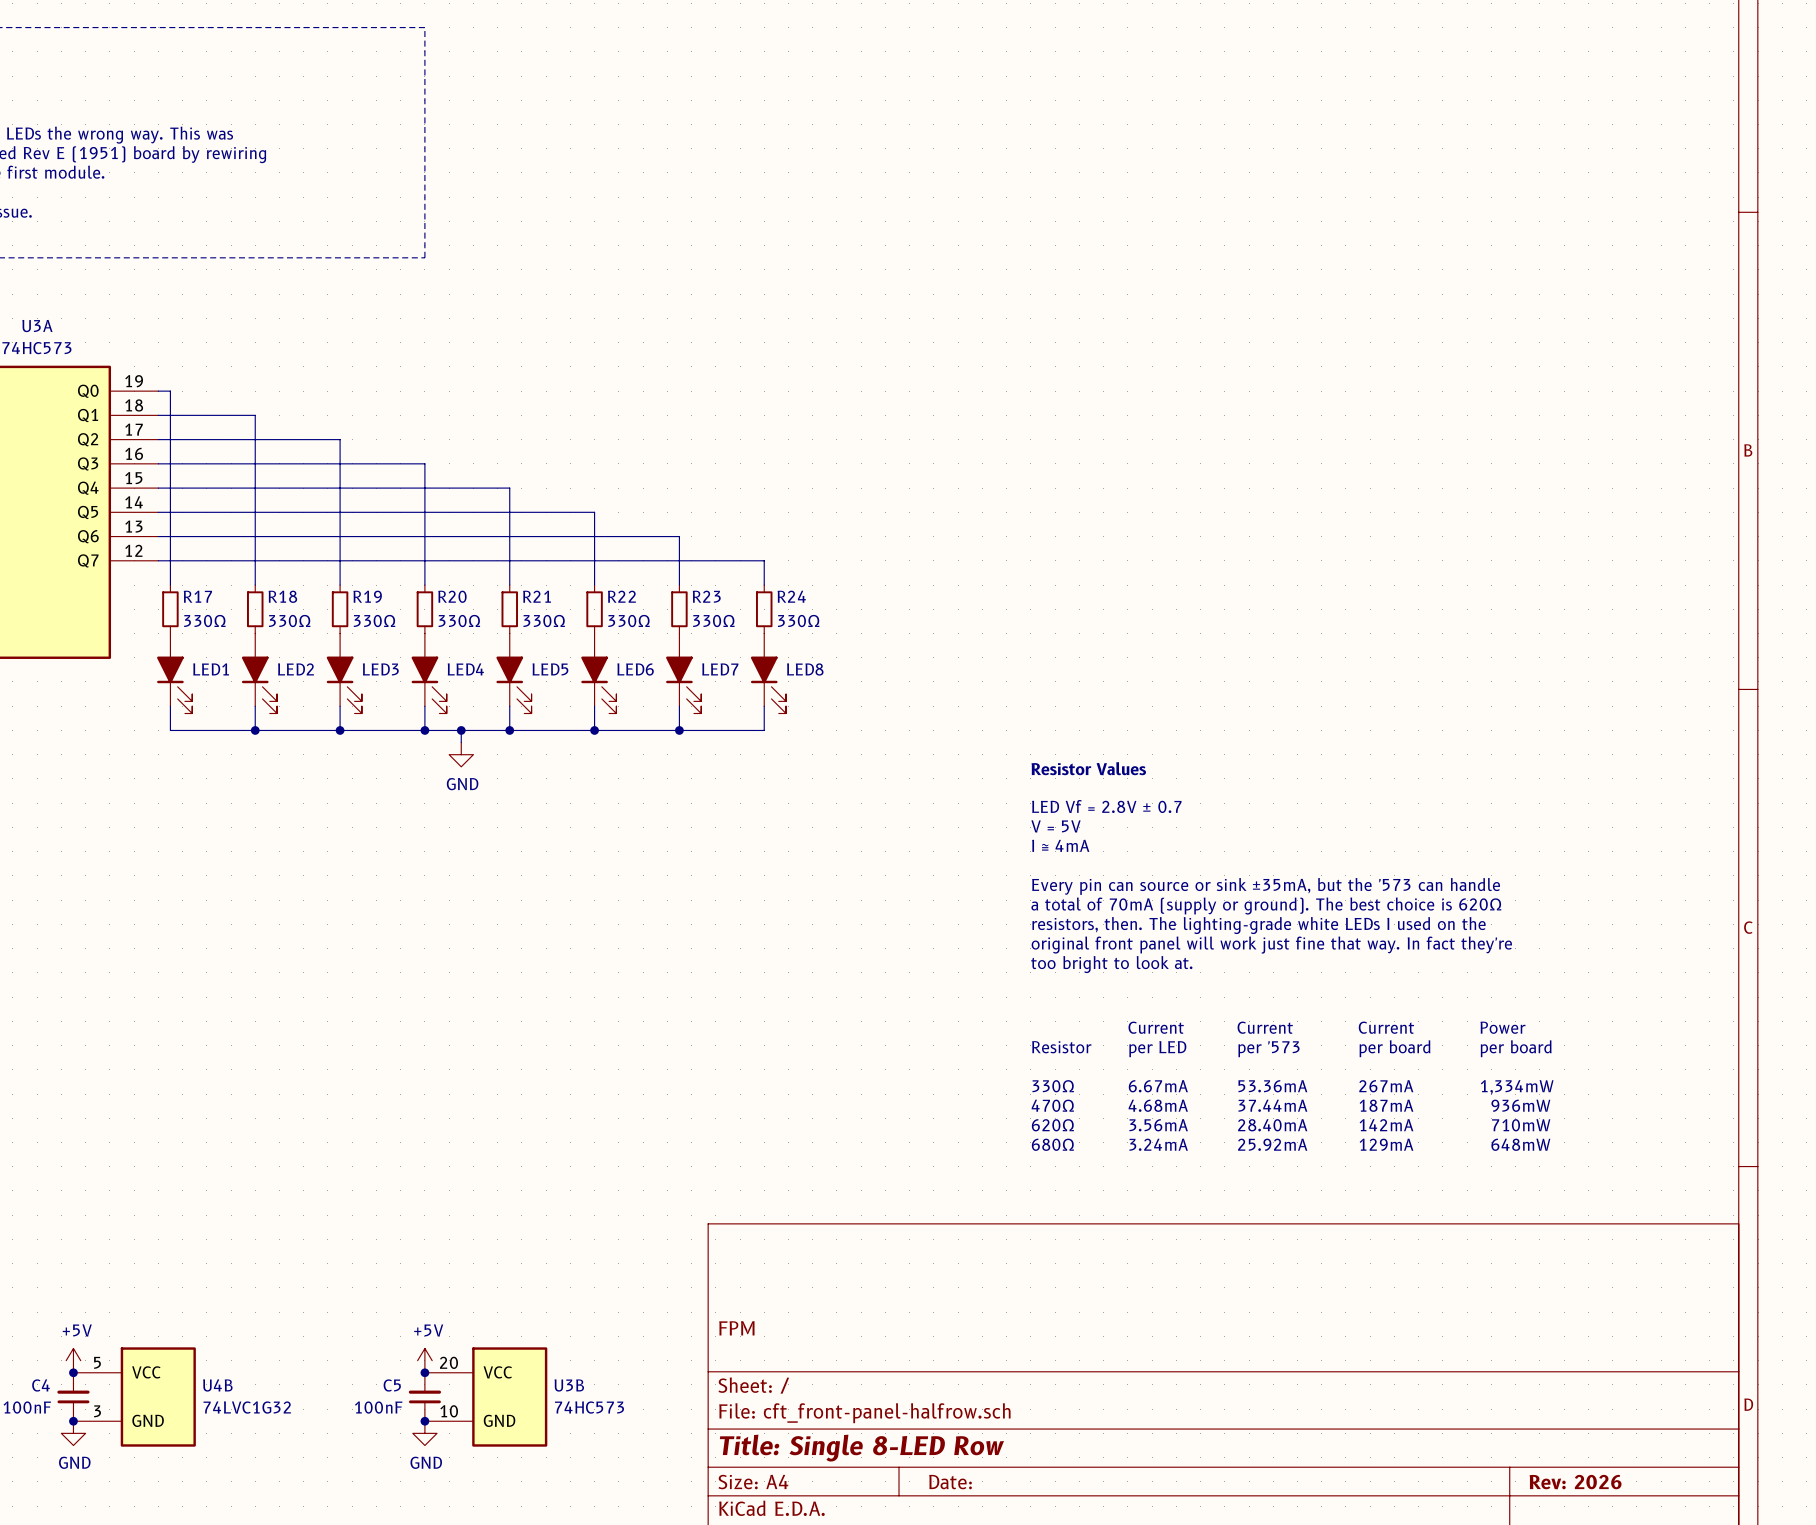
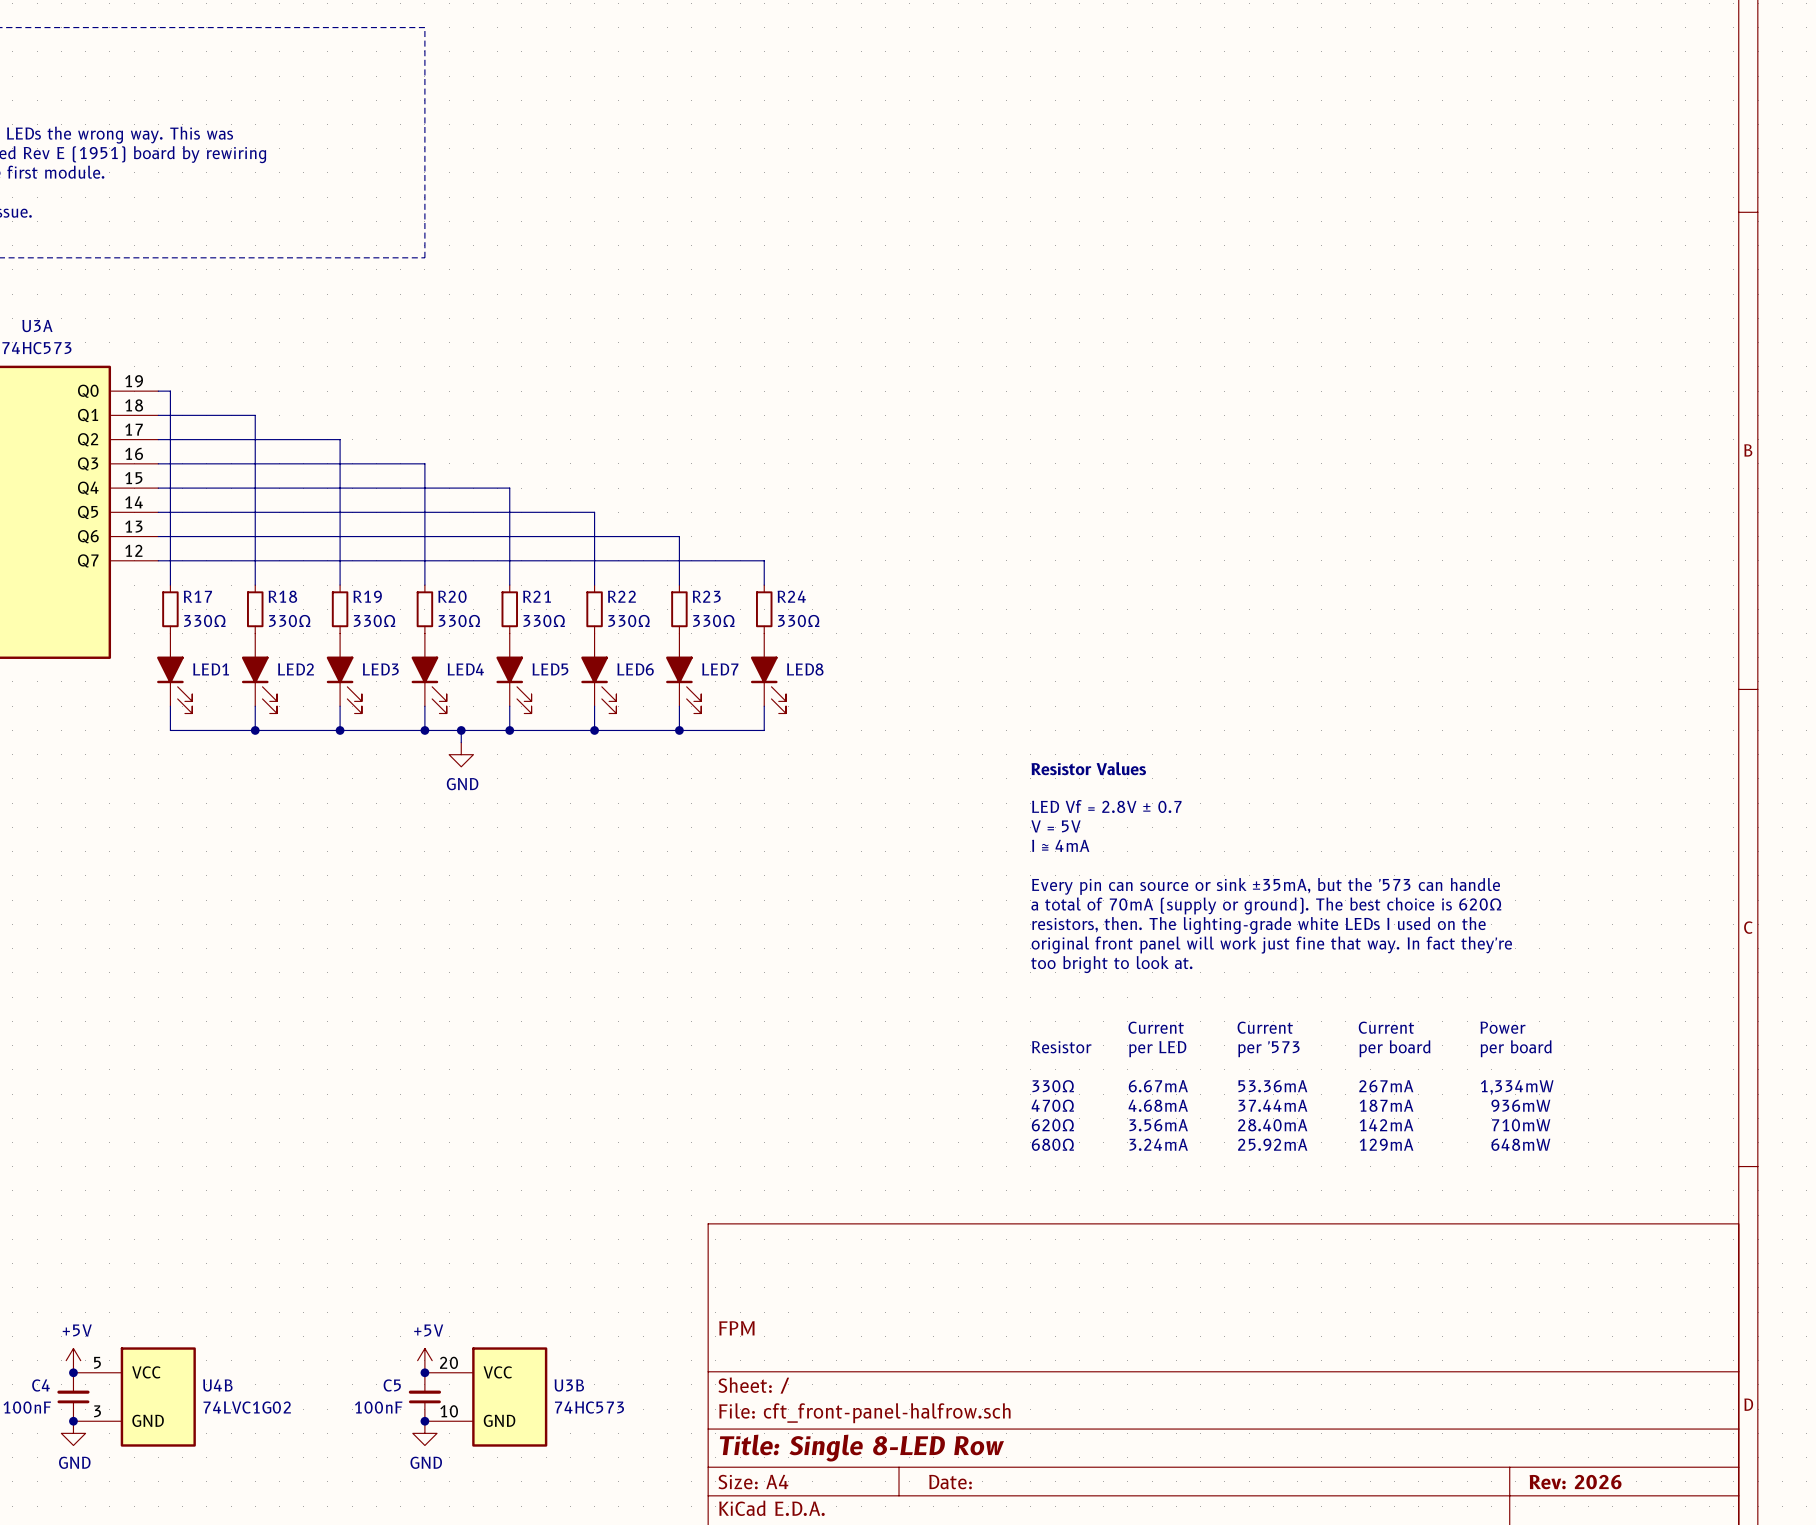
U4B value: 74LVC1G32 (247, 1407) -> 74LVC1G02 (247, 1407)

